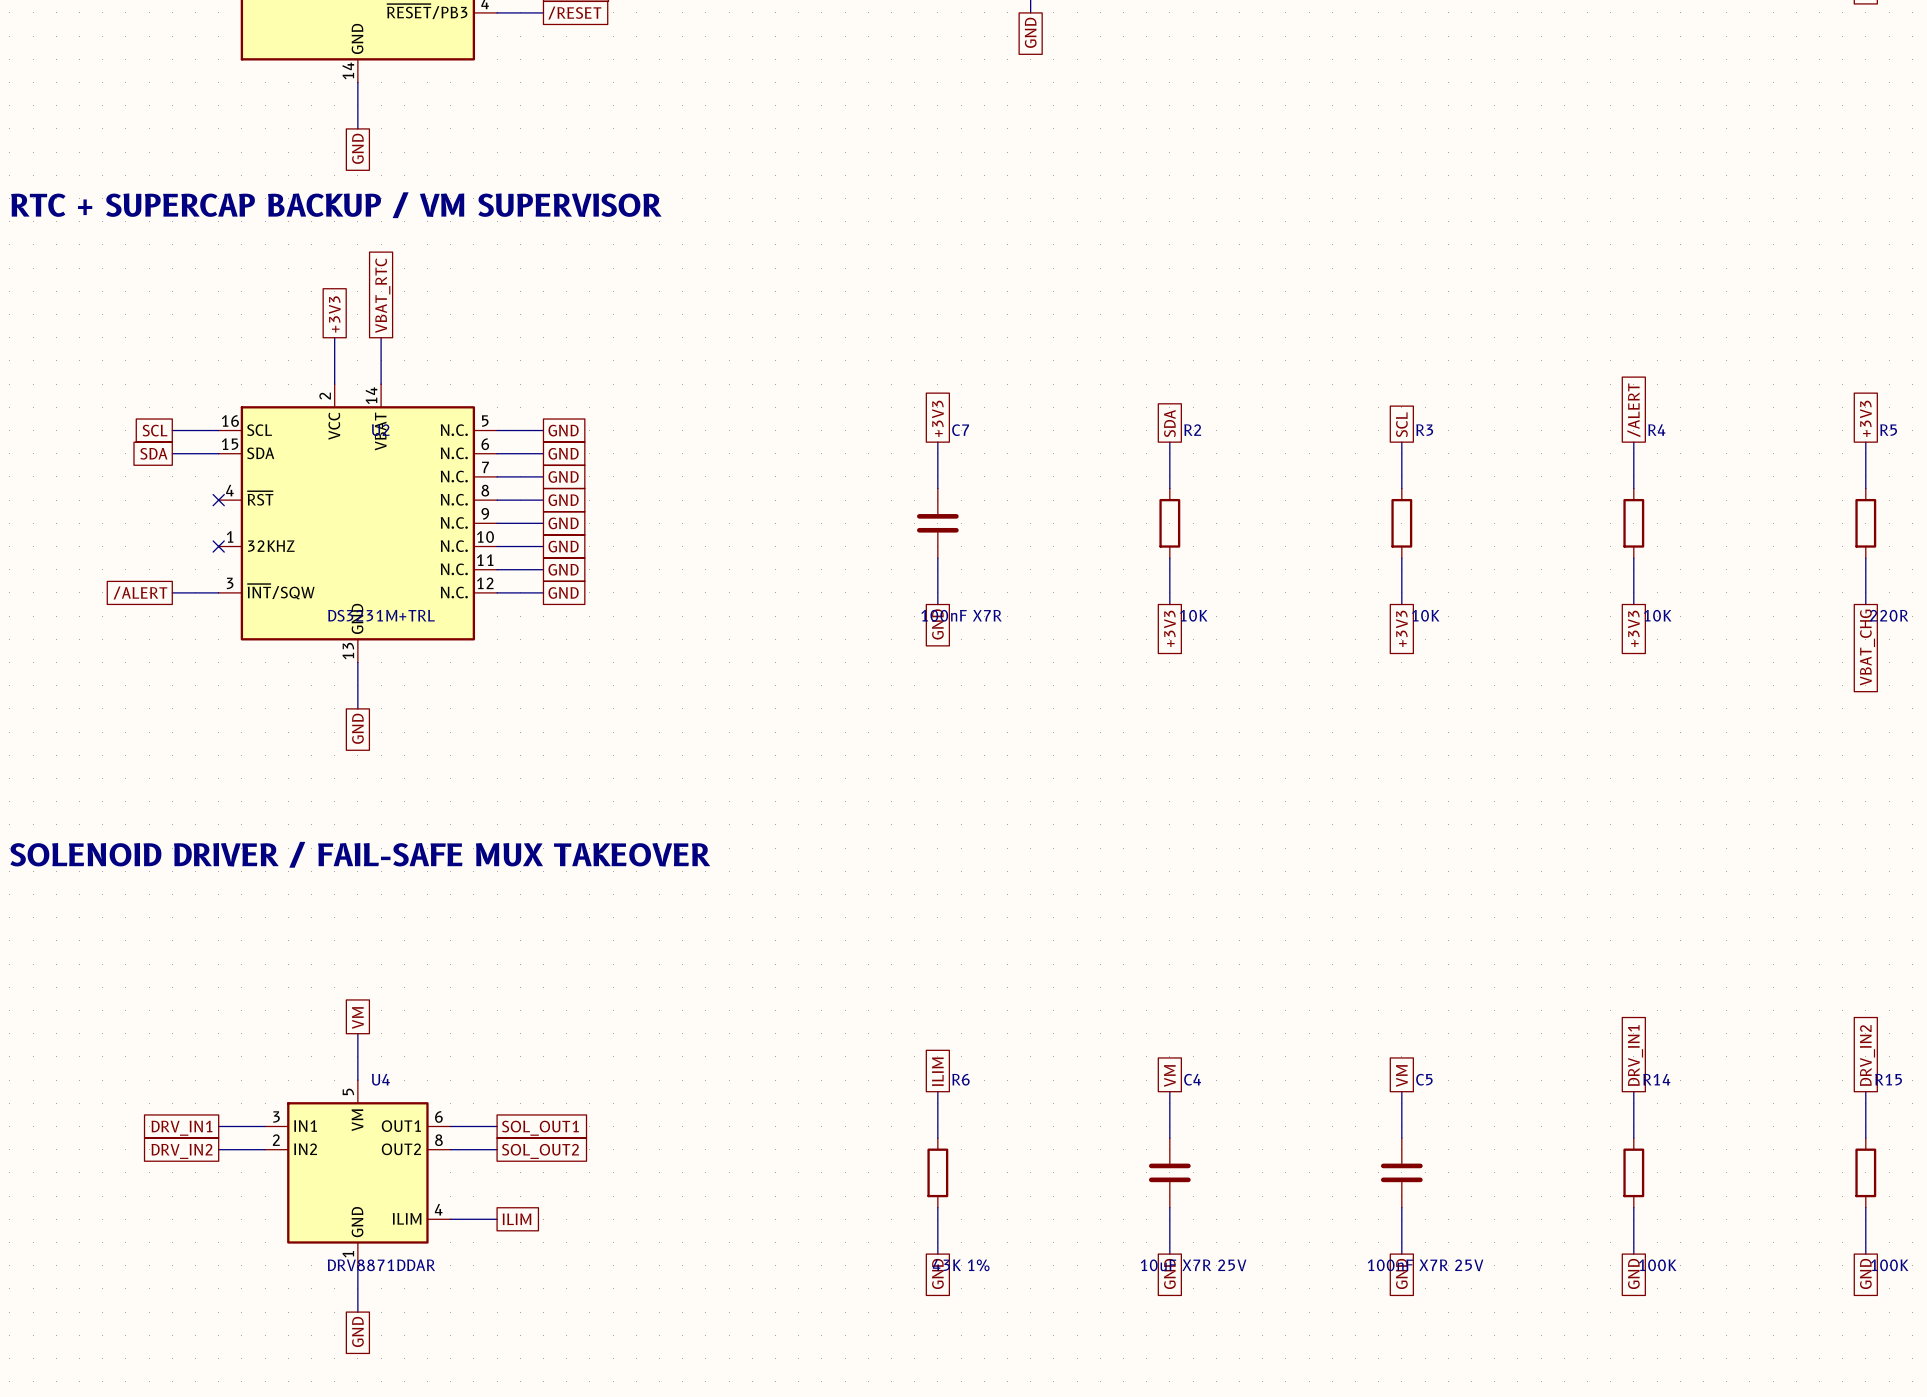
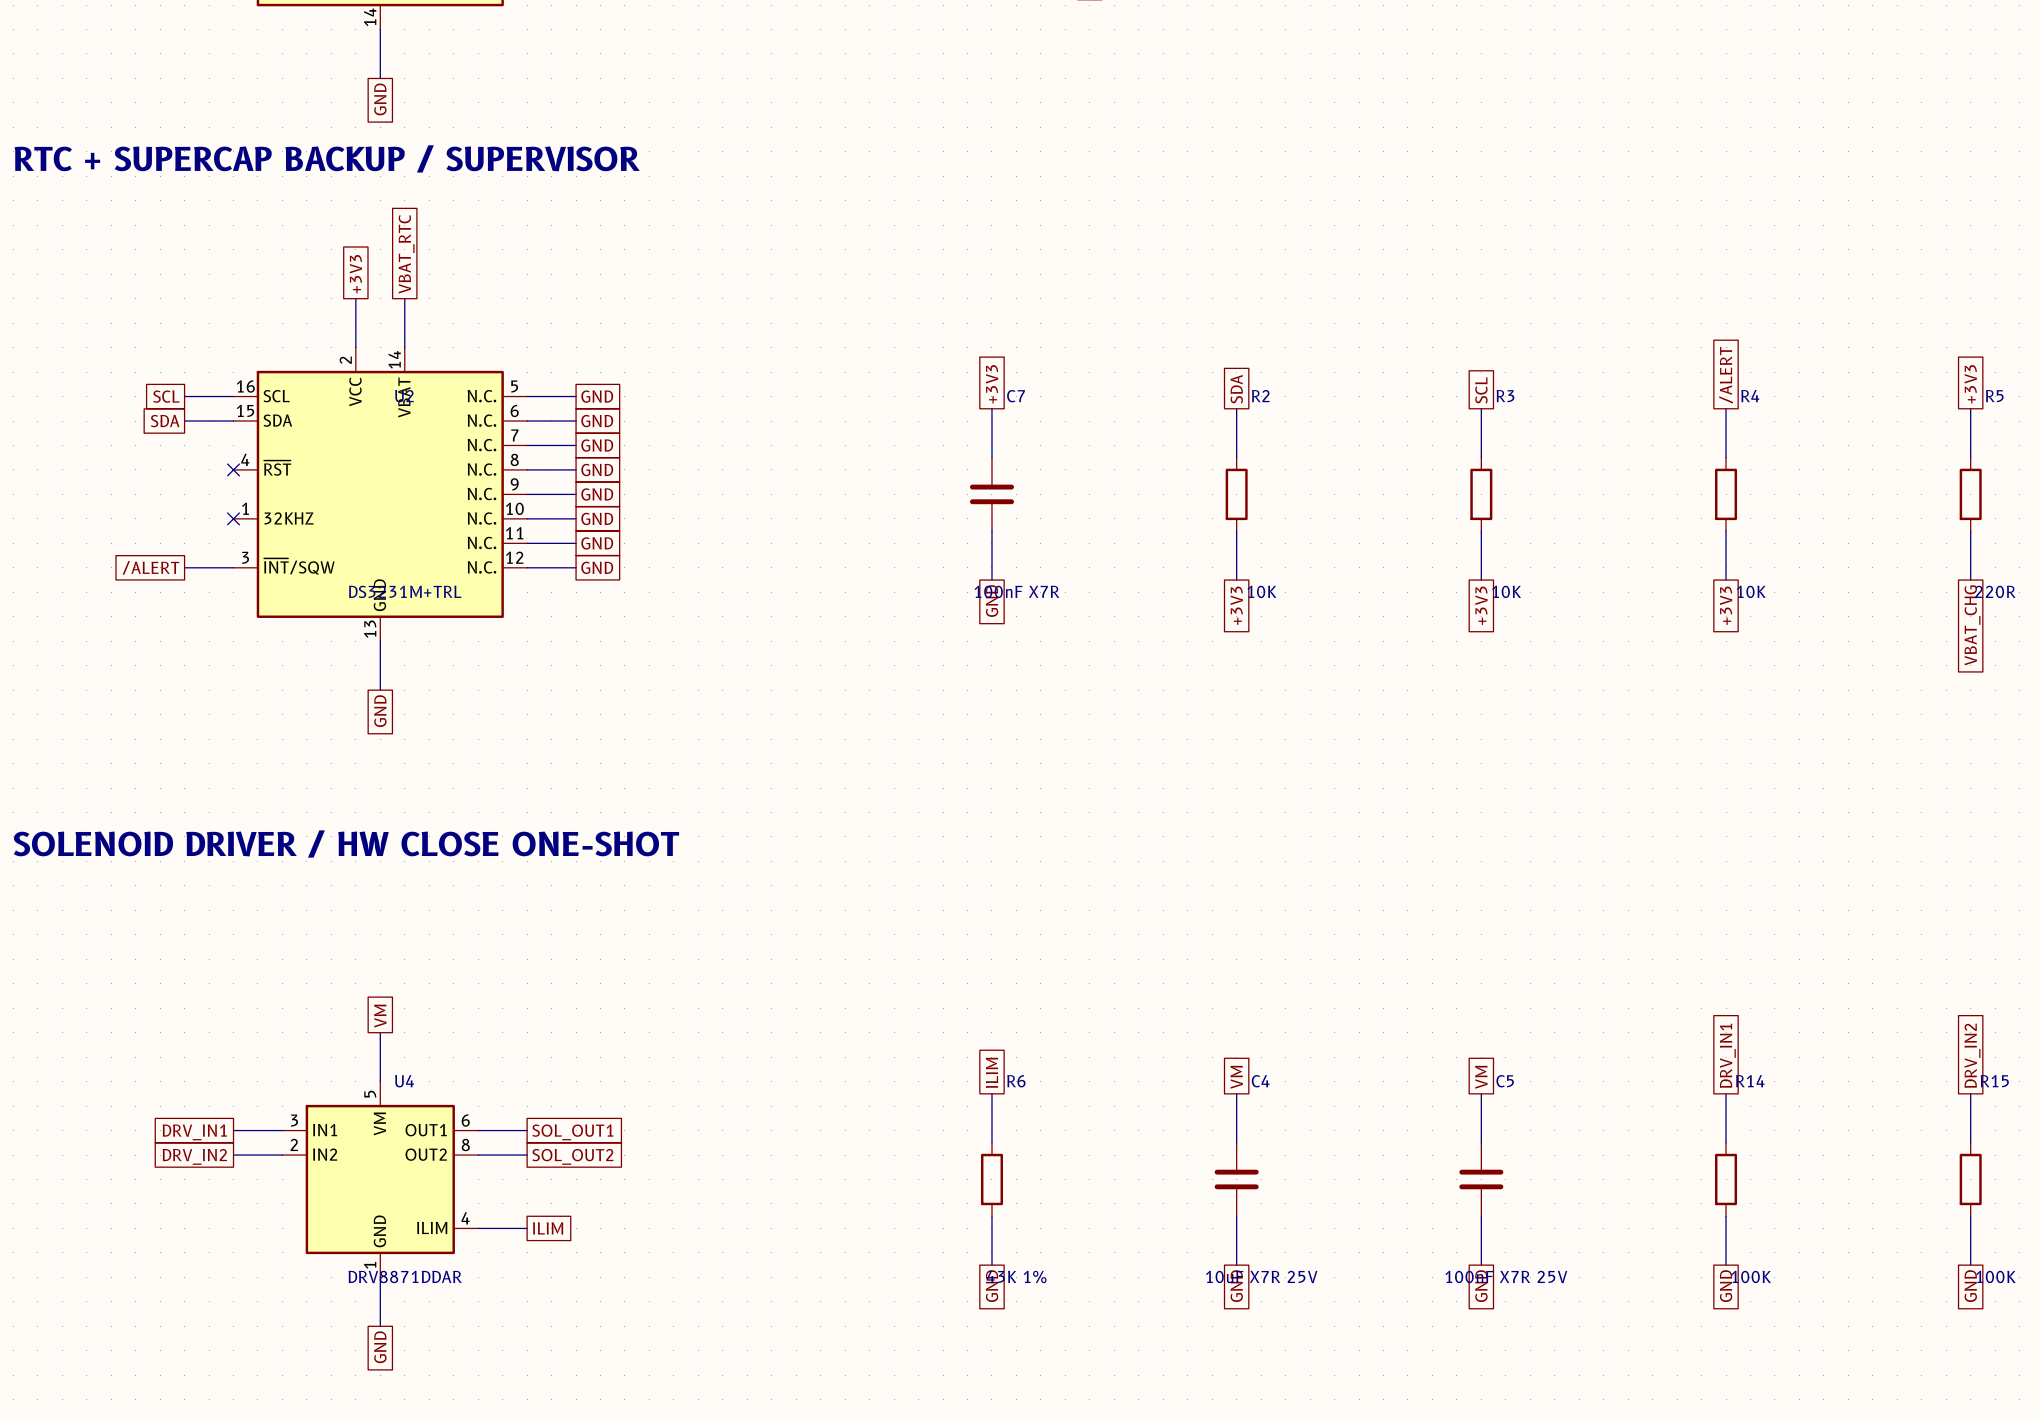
text: RTC + SUPERCAP BACKUP / VM SUPERVISOR (336, 205) -> RTC + SUPERCAP BACKUP / SUPERVISOR (327, 158)
text: SOLENOID DRIVER / FAIL-SAFE MUX TAKEOVER (360, 854) -> SOLENOID DRIVER / HW CLOSE ONE-SHOT (346, 843)

